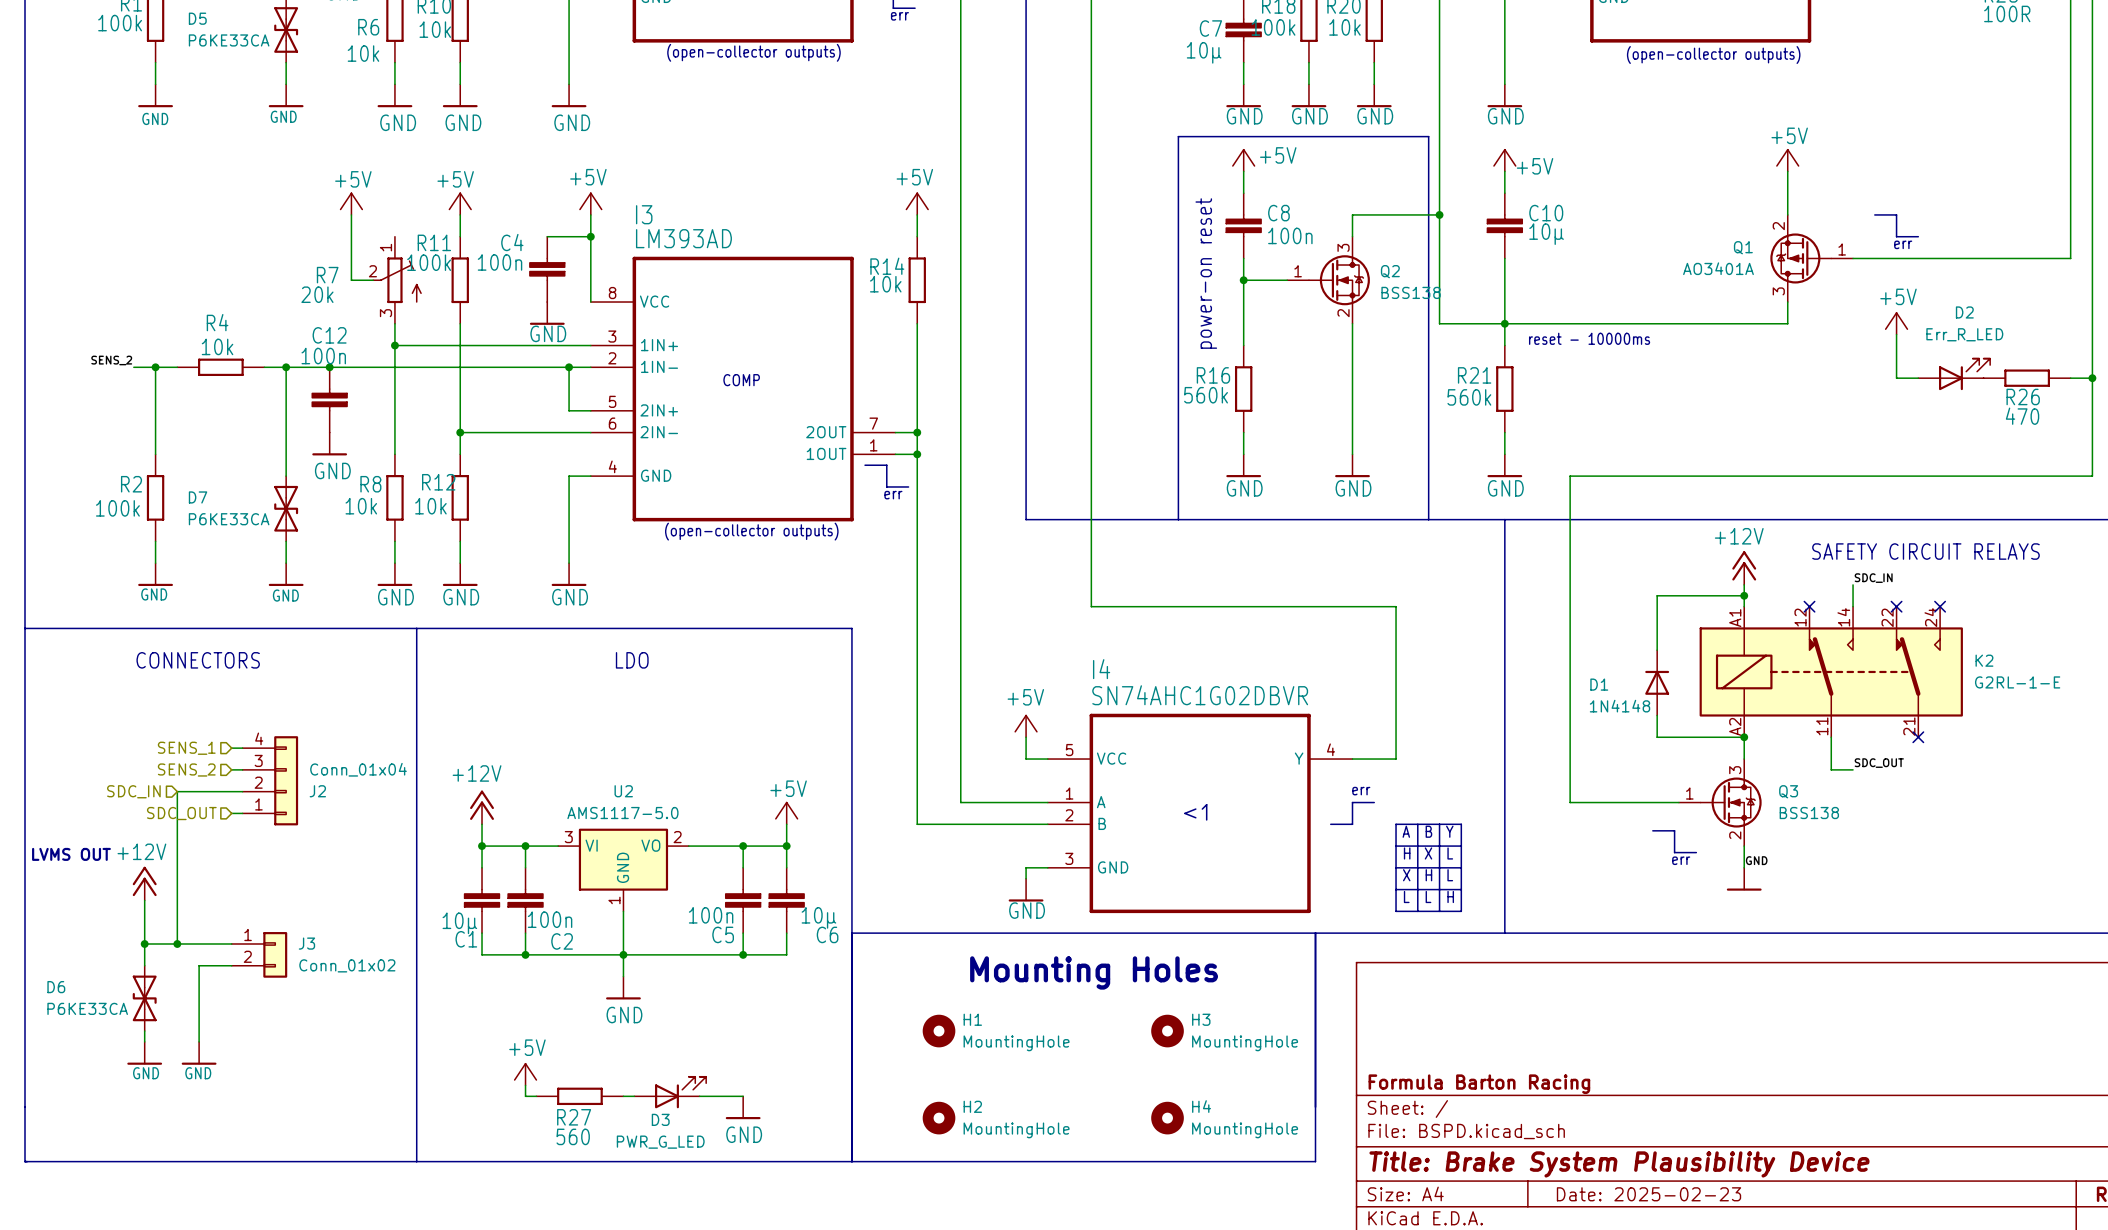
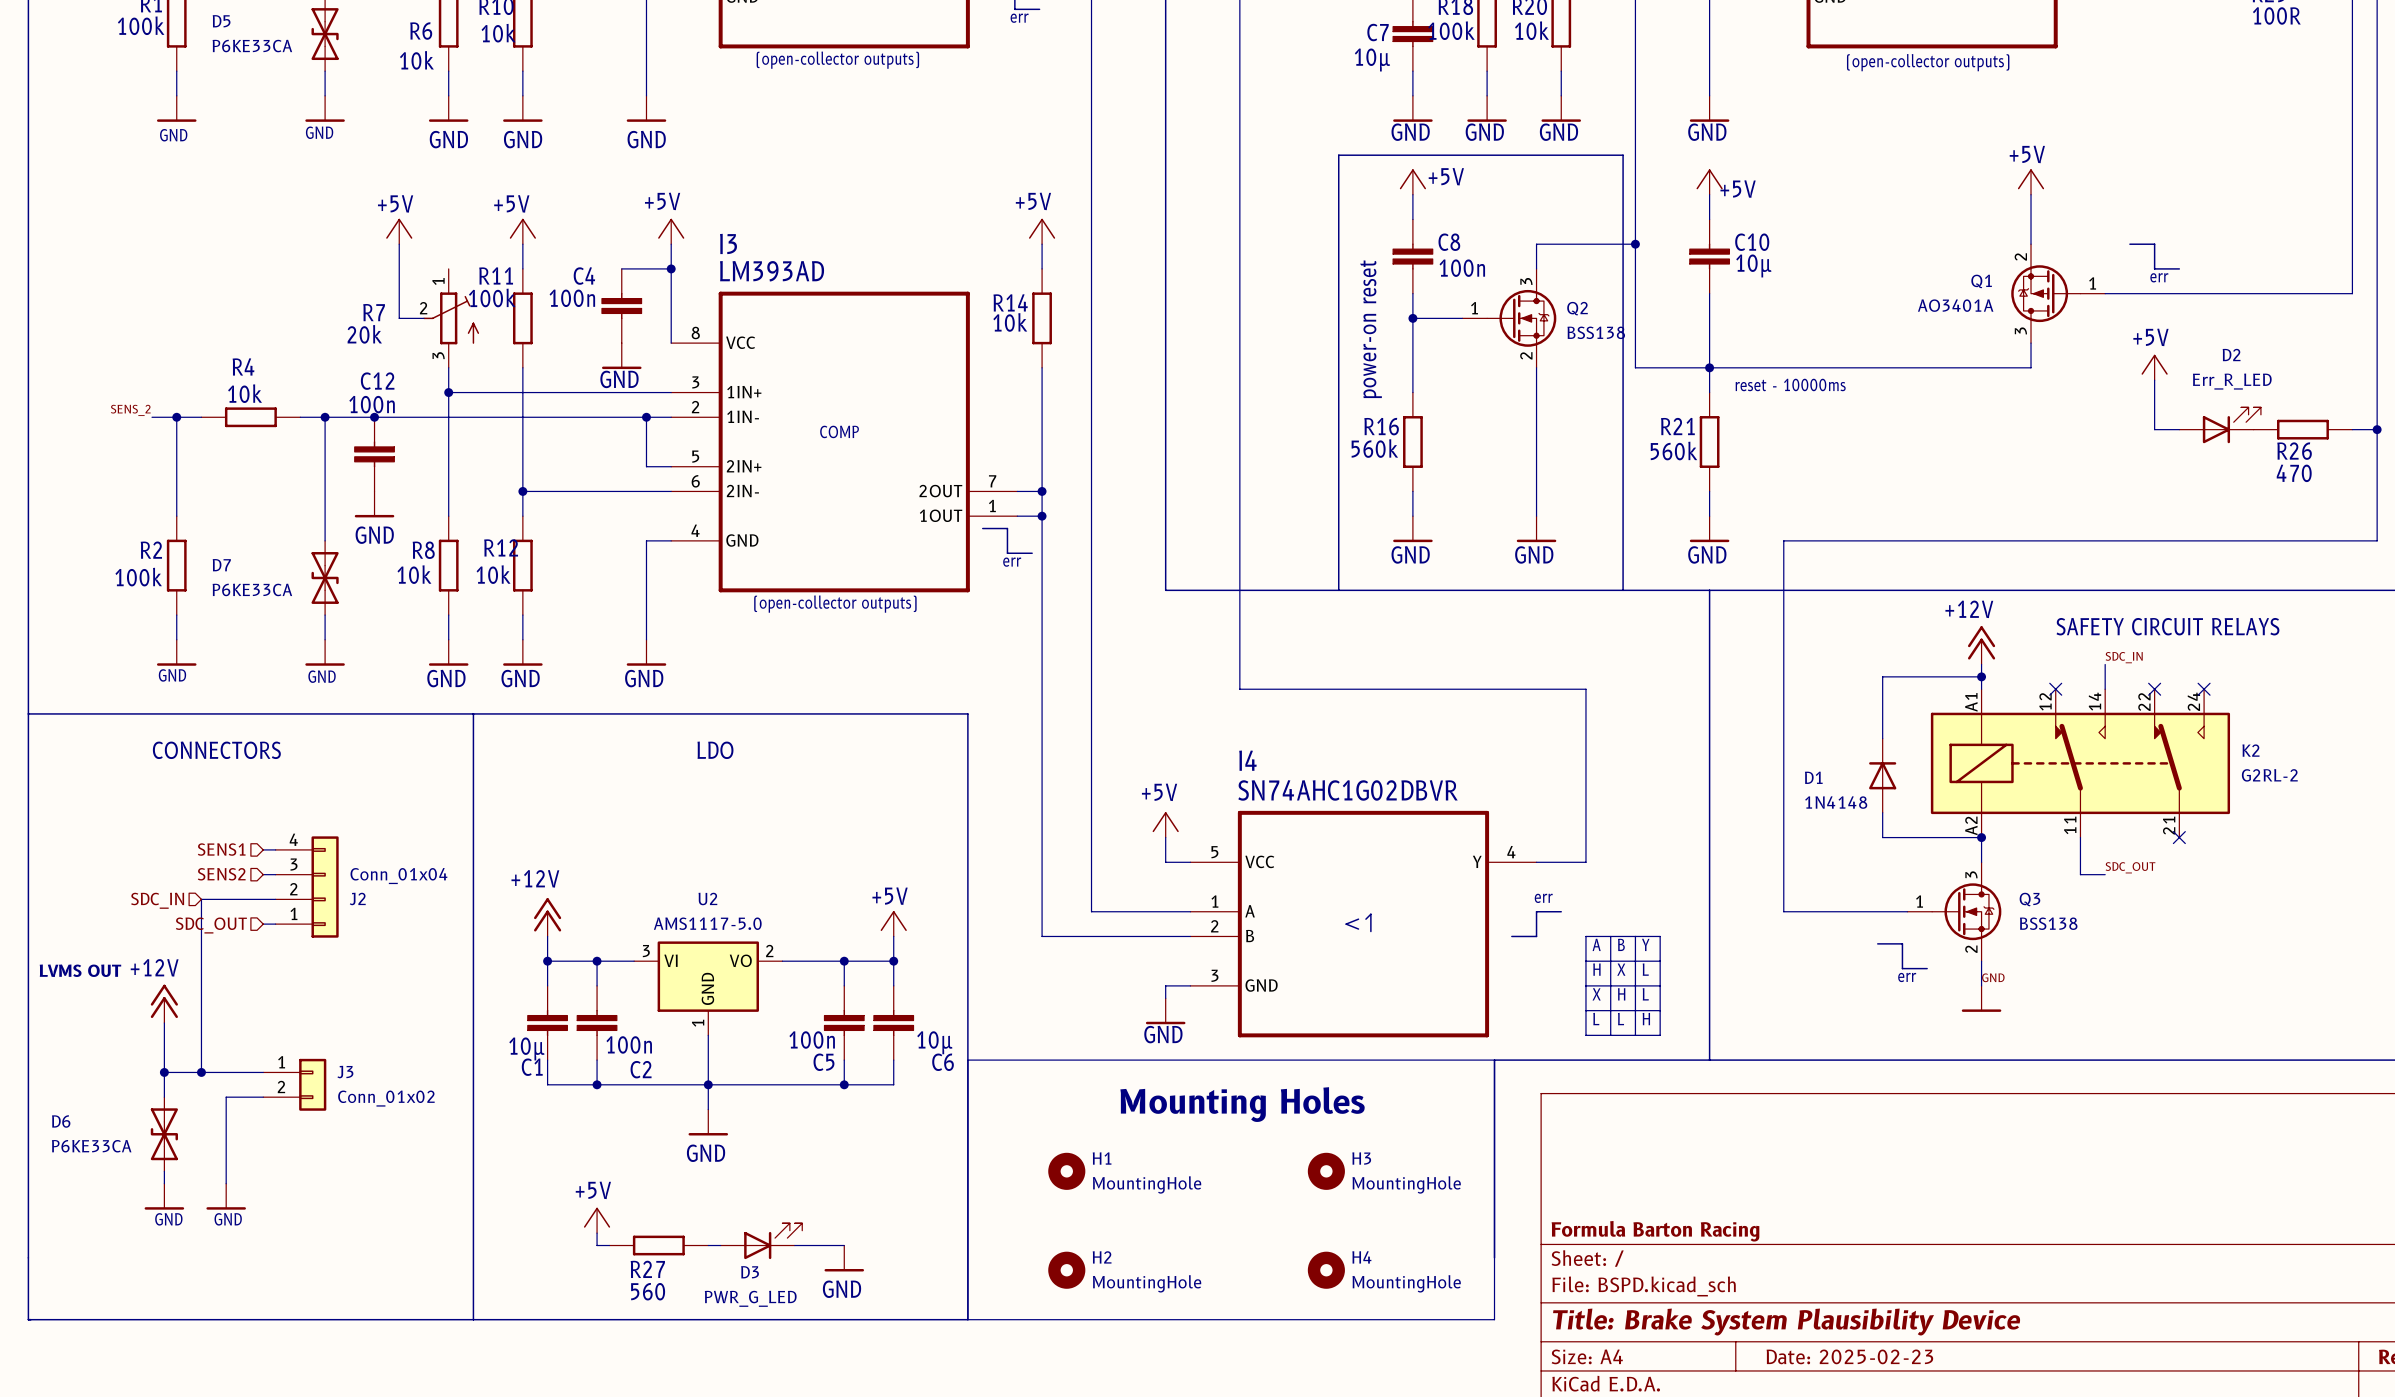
K2 value: G2RL-1-E (2017, 682) -> G2RL-2 (2269, 775)
hierarchical label: SENS_1 (186, 748) -> SENS1 (221, 849)
hierarchical label: SENS_2 (186, 770) -> SENS2 (221, 874)

